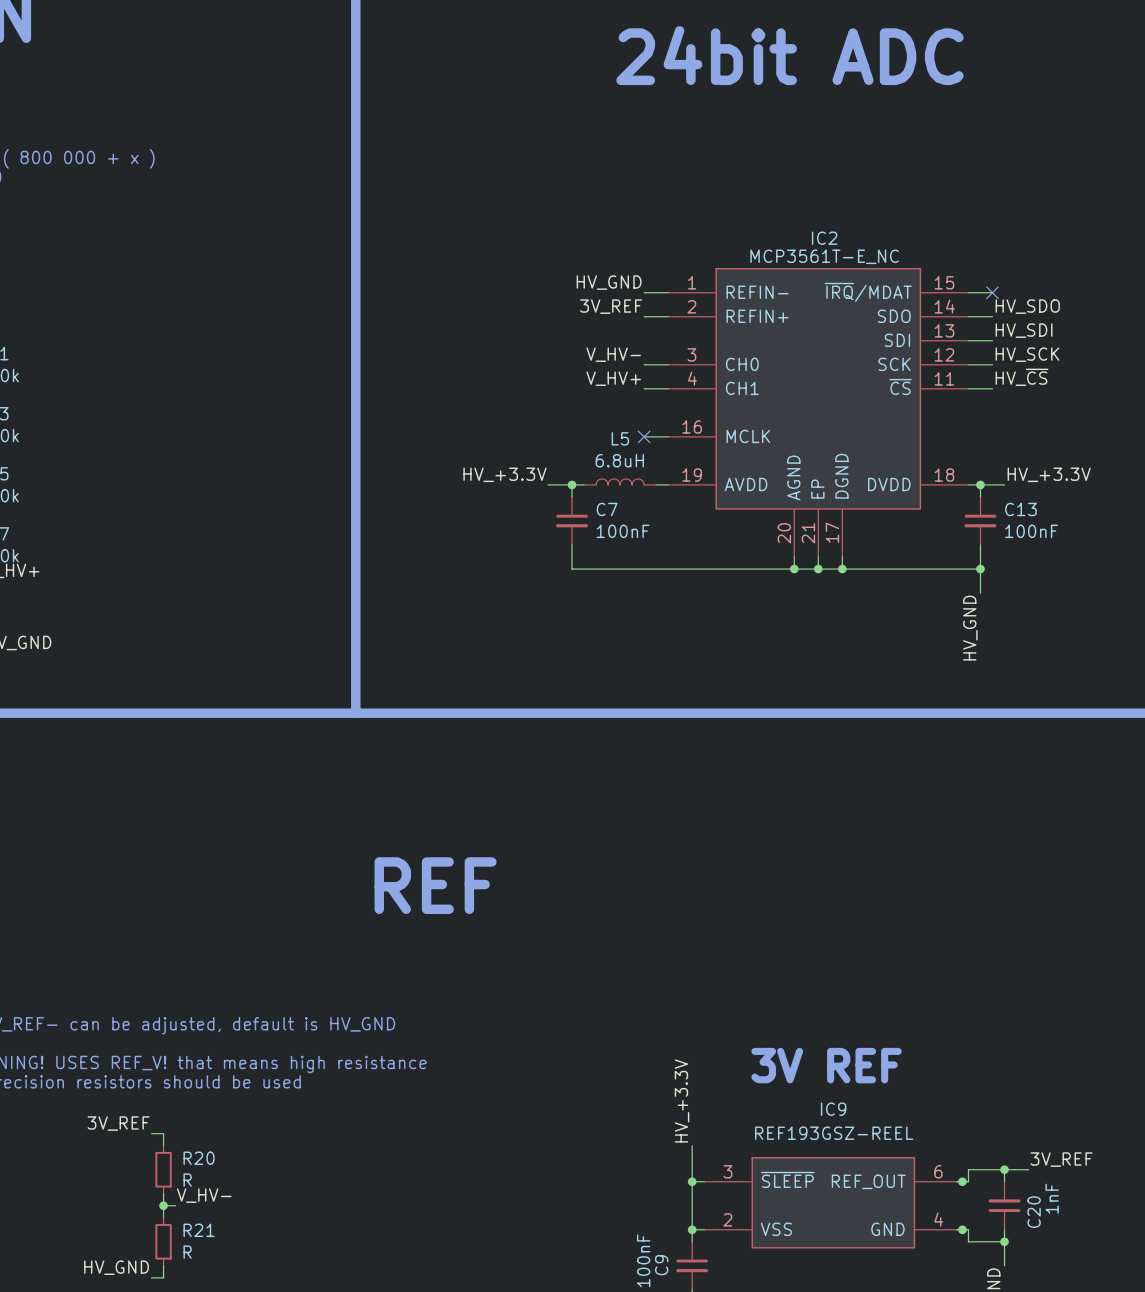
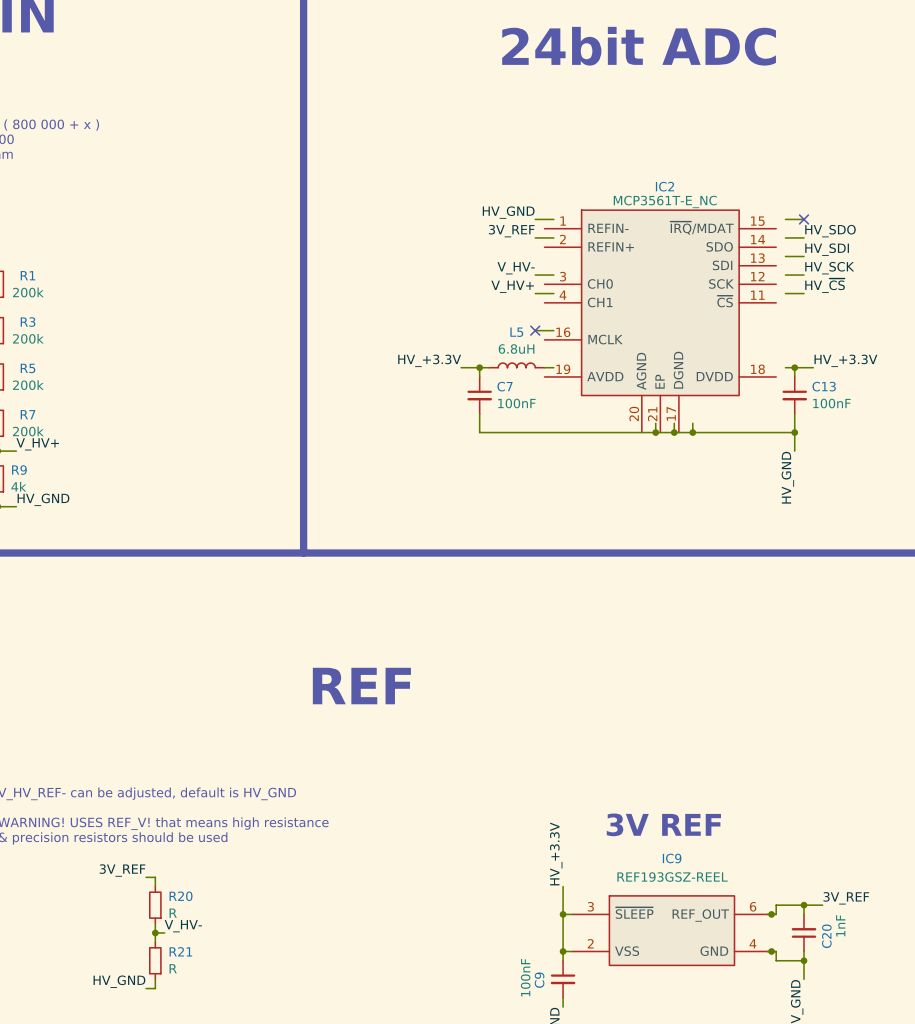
label position: HV_GND (609, 282) -> HV_GND (508, 212)
wire: (644, 292) (668, 292) -> (535, 219) (553, 219)
wire: (968, 292) (992, 292) -> (785, 219) (804, 219)
no-connect mark position: (992, 292) -> (804, 219)
label position: 3V_REF (611, 306) -> 3V_REF (511, 231)
label position: HV_SDO (1027, 306) -> HV_SDO (830, 231)
wire: (644, 316) (668, 316) -> (535, 237) (553, 237)
wire: (968, 316) (992, 316) -> (785, 237) (804, 237)
label position: HV_SDI (1024, 330) -> HV_SDI (827, 249)
wire: (968, 340) (992, 340) -> (785, 256) (804, 256)
label position: V_HV- (613, 354) -> V_HV- (516, 268)
label position: HV_SCK (1027, 354) -> HV_SCK (829, 268)
wire: (644, 364) (668, 364) -> (535, 275) (553, 275)
wire: (968, 364) (992, 364) -> (785, 275) (804, 275)
label position: HV_~{CS} (1022, 377) -> HV_~{CS} (825, 285)
label position: V_HV+ (613, 378) -> V_HV+ (512, 286)
wire: (644, 388) (668, 388) -> (535, 293) (553, 293)
wire: (968, 388) (992, 388) -> (785, 293) (804, 293)
wire: (644, 436) (668, 436) -> (535, 330) (553, 330)
no-connect mark position: (644, 436) -> (535, 330)
wire: none -> (461, 367) (488, 367)
label position: HV_+3.3V (505, 474) -> HV_+3.3V (429, 360)
label position: HV_+3.3V (1049, 474) -> HV_+3.3V (845, 360)
L5 position: (620, 481) -> (516, 365)
wire: (548, 484) (584, 484) -> (479, 367) (479, 376)
wire: (572, 484) (572, 496) -> none
junction position: (572, 484) -> (479, 367)
wire: (656, 484) (668, 484) -> (544, 367) (553, 367)
wire: (968, 484) (1004, 484) -> (785, 367) (813, 367)
wire: (980, 484) (980, 496) -> (794, 367) (794, 376)
junction position: (980, 484) -> (794, 367)
C7 position: (572, 520) -> (479, 395)
C13 position: (980, 520) -> (794, 395)
wire: (572, 545) (572, 569) (980, 569) -> (479, 414) (479, 432) (794, 432)
wire: (980, 545) (980, 593) -> (794, 414) (794, 451)
wire: (794, 557) (794, 569) -> (655, 423) (655, 432)
junction: none -> (655, 432)
wire: (818, 557) (818, 569) -> (674, 423) (674, 432)
junction: none -> (674, 432)
wire: (842, 557) (842, 569) -> (692, 423) (692, 432)
junction: none -> (692, 432)
junction: (794, 569) -> none
junction: (818, 569) -> none
junction: (842, 569) -> none
junction position: (980, 569) -> (794, 432)
label position: HV_GND (970, 628) -> HV_GND (787, 477)

